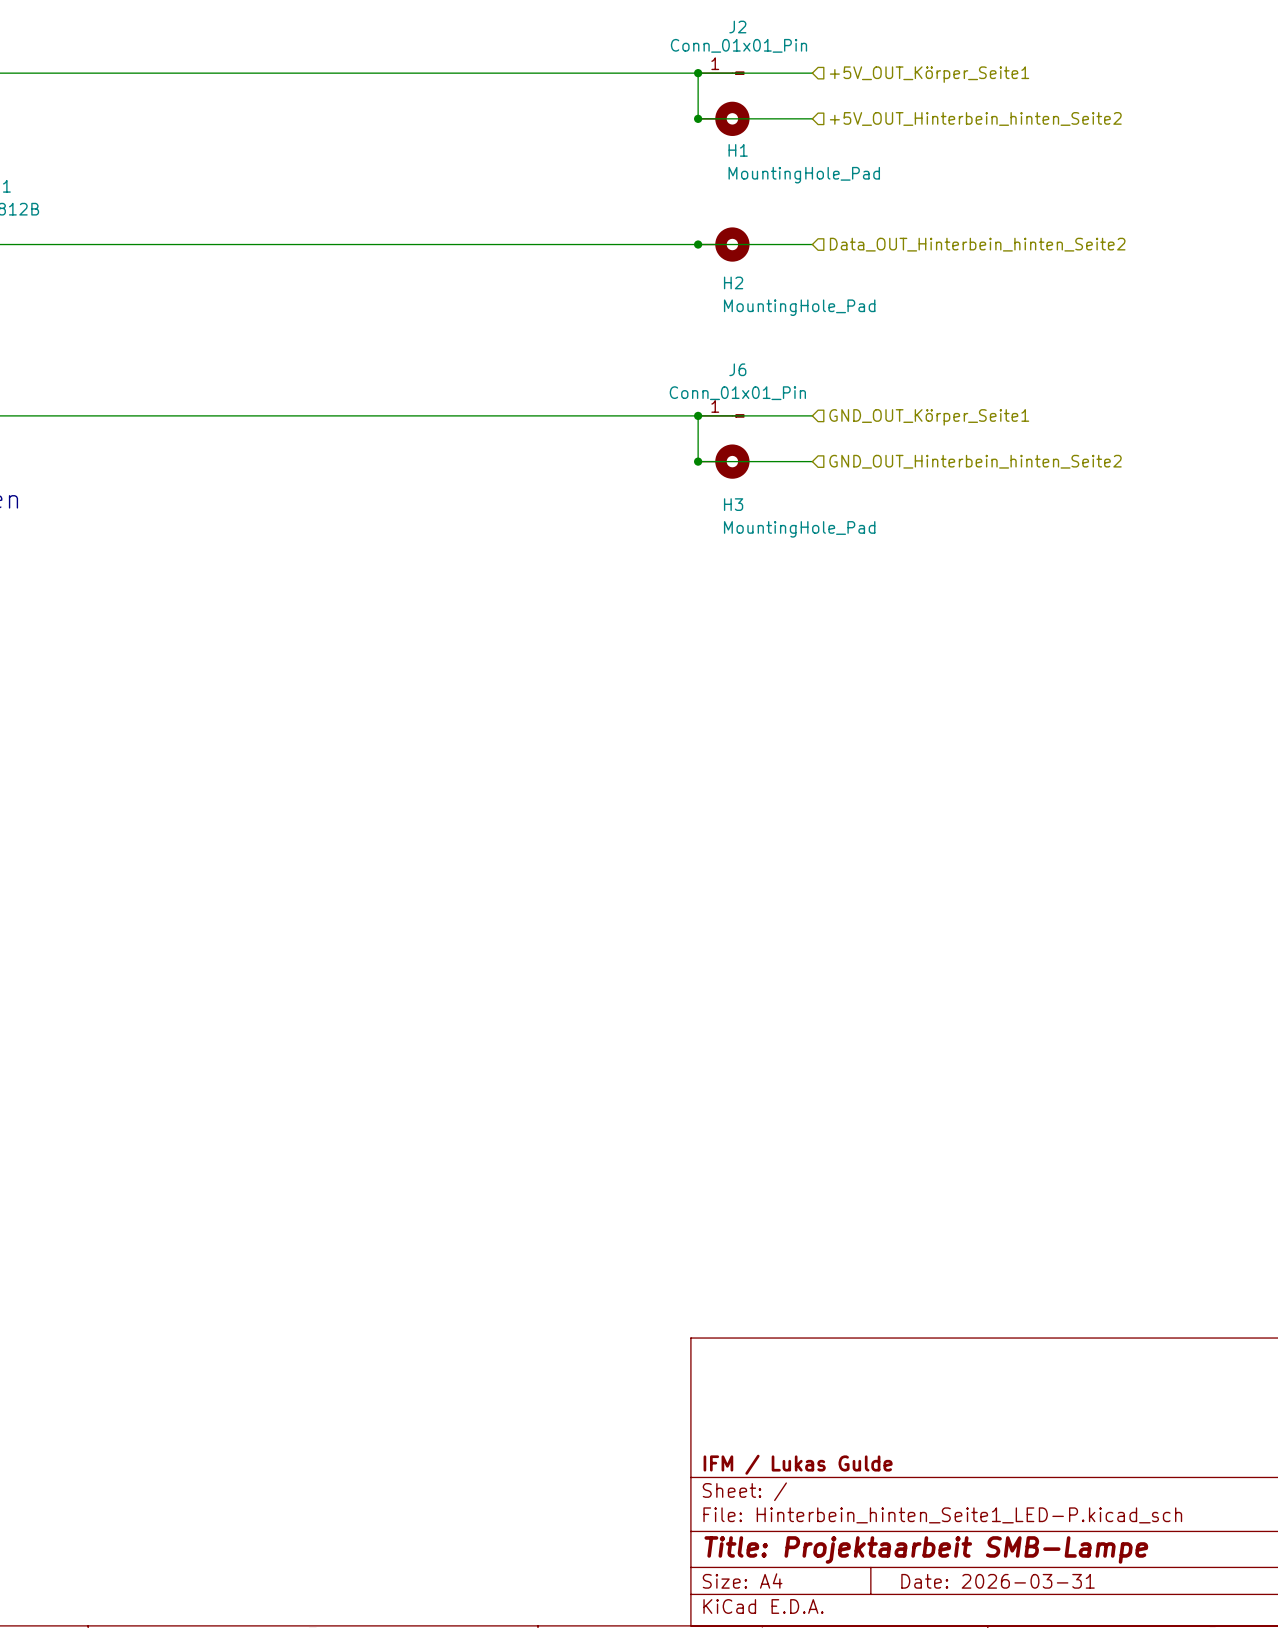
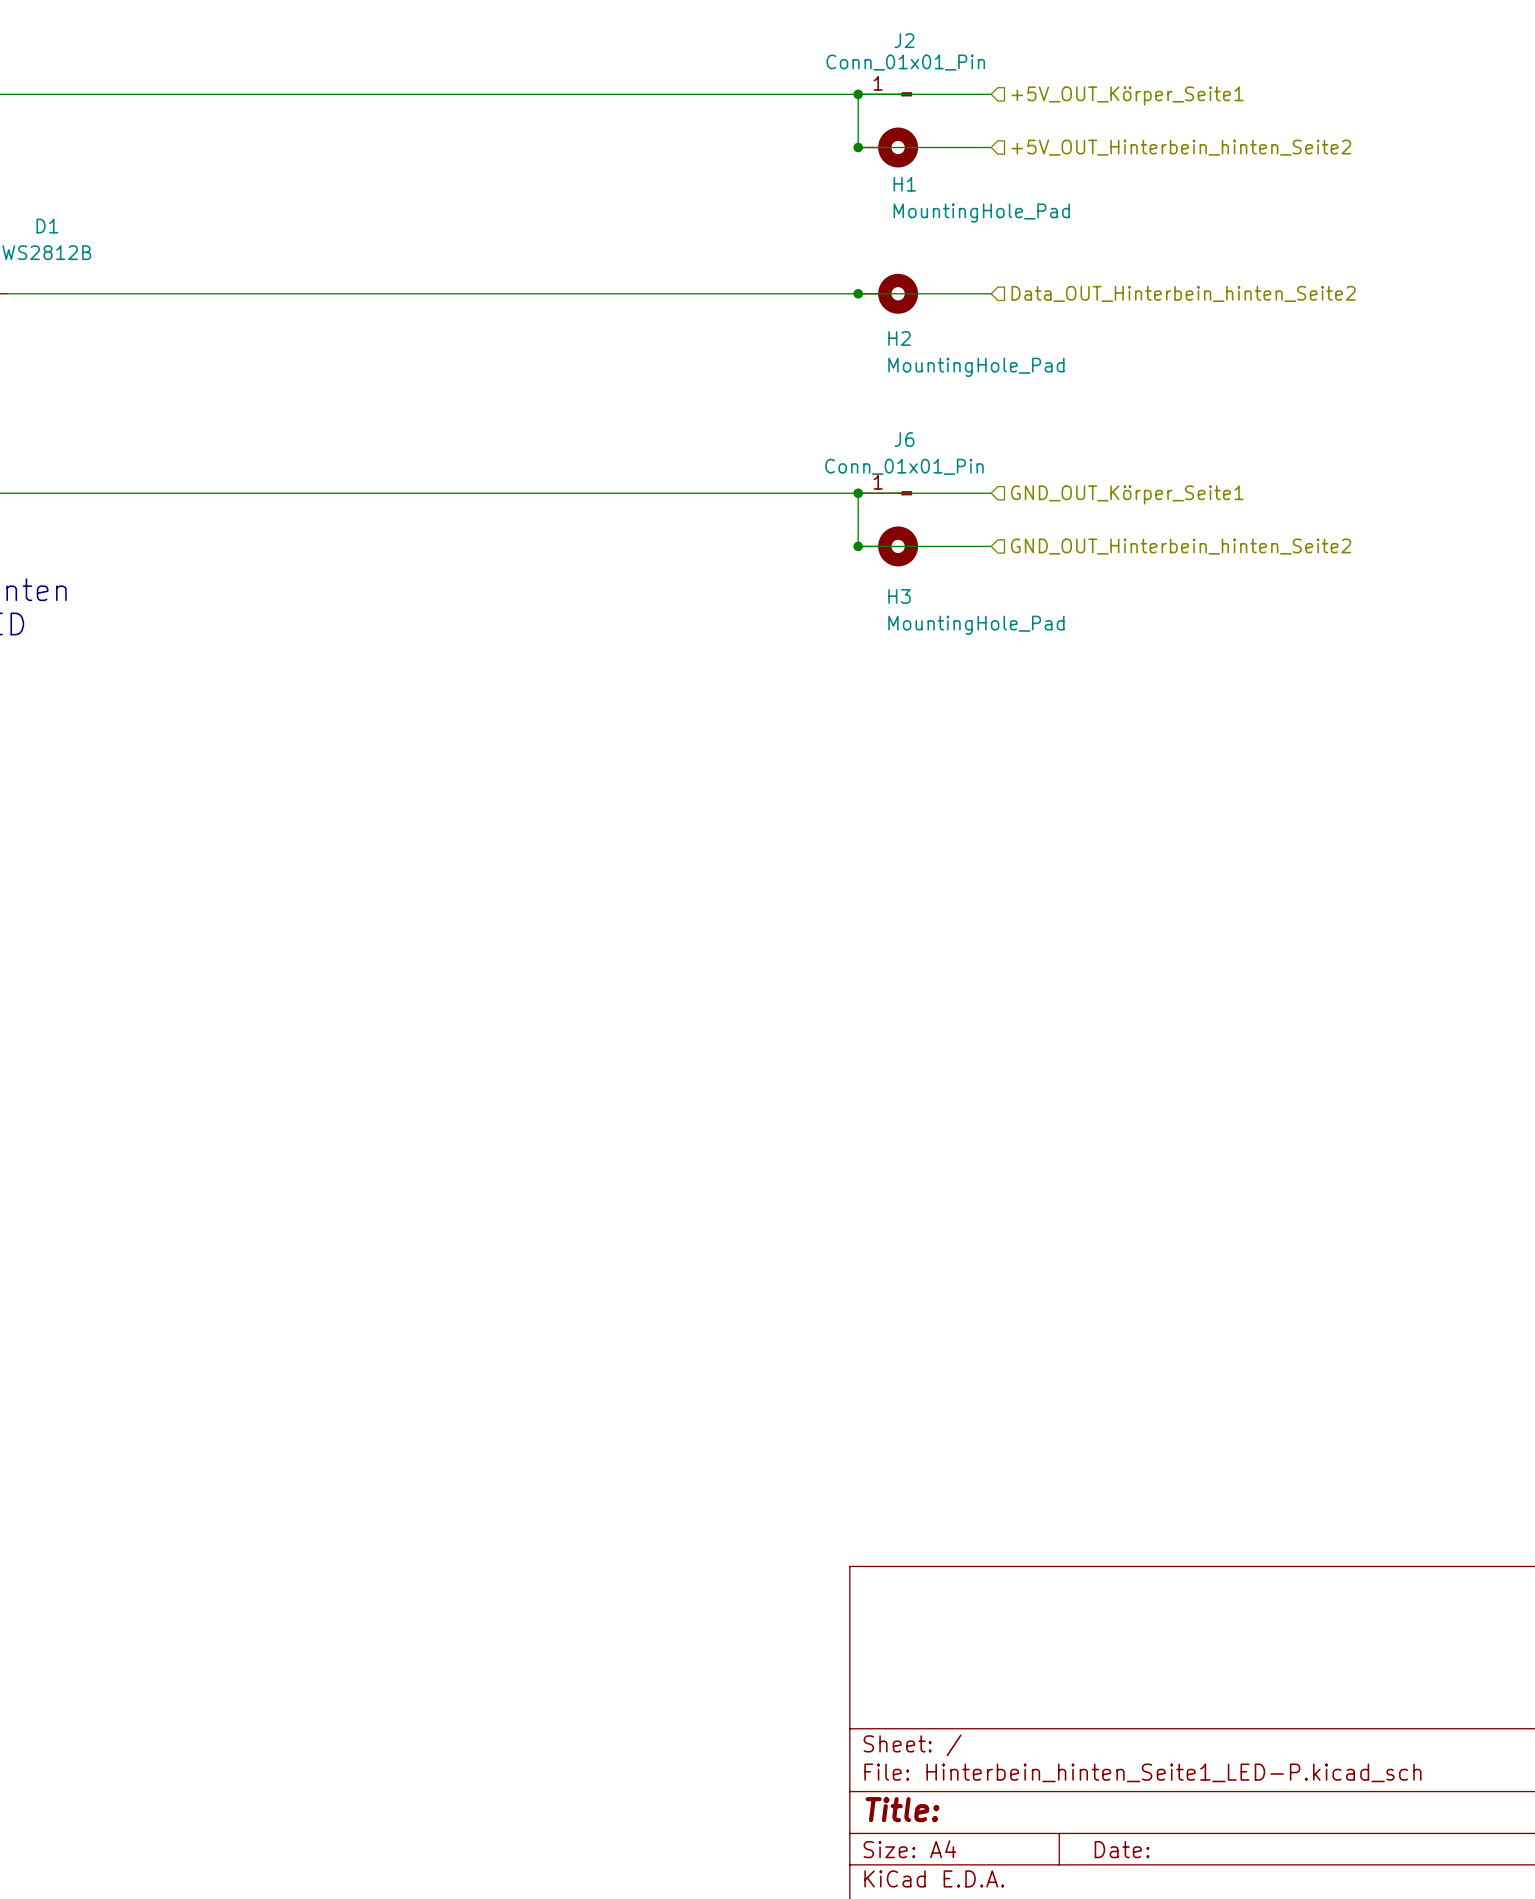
title block: IFM / Lukas Gulde (798, 1464) -> none
title block: Title: Projektaarbeit SMB-Lampe (926, 1549) -> Title: (902, 1809)
title block: Date: 2026-03-31 (998, 1581) -> Date: (1122, 1849)

